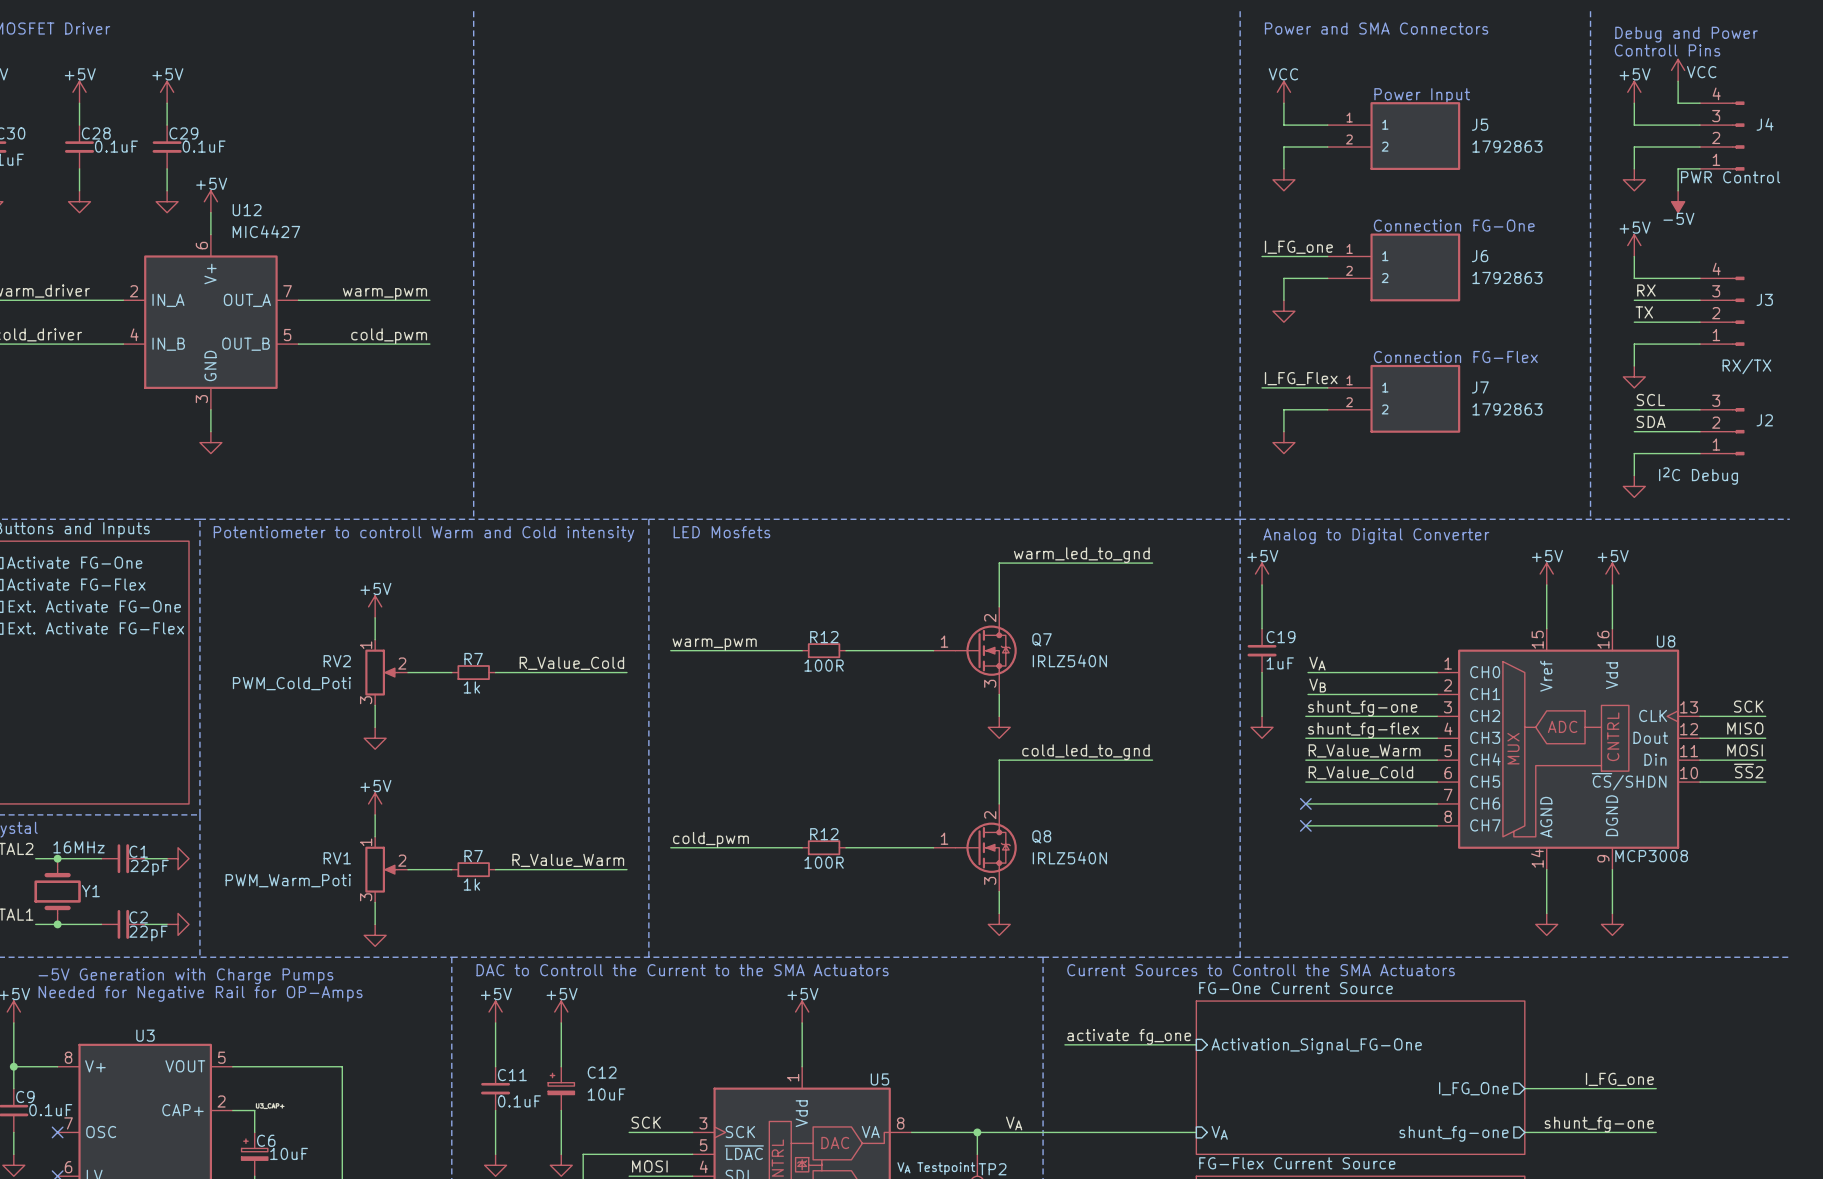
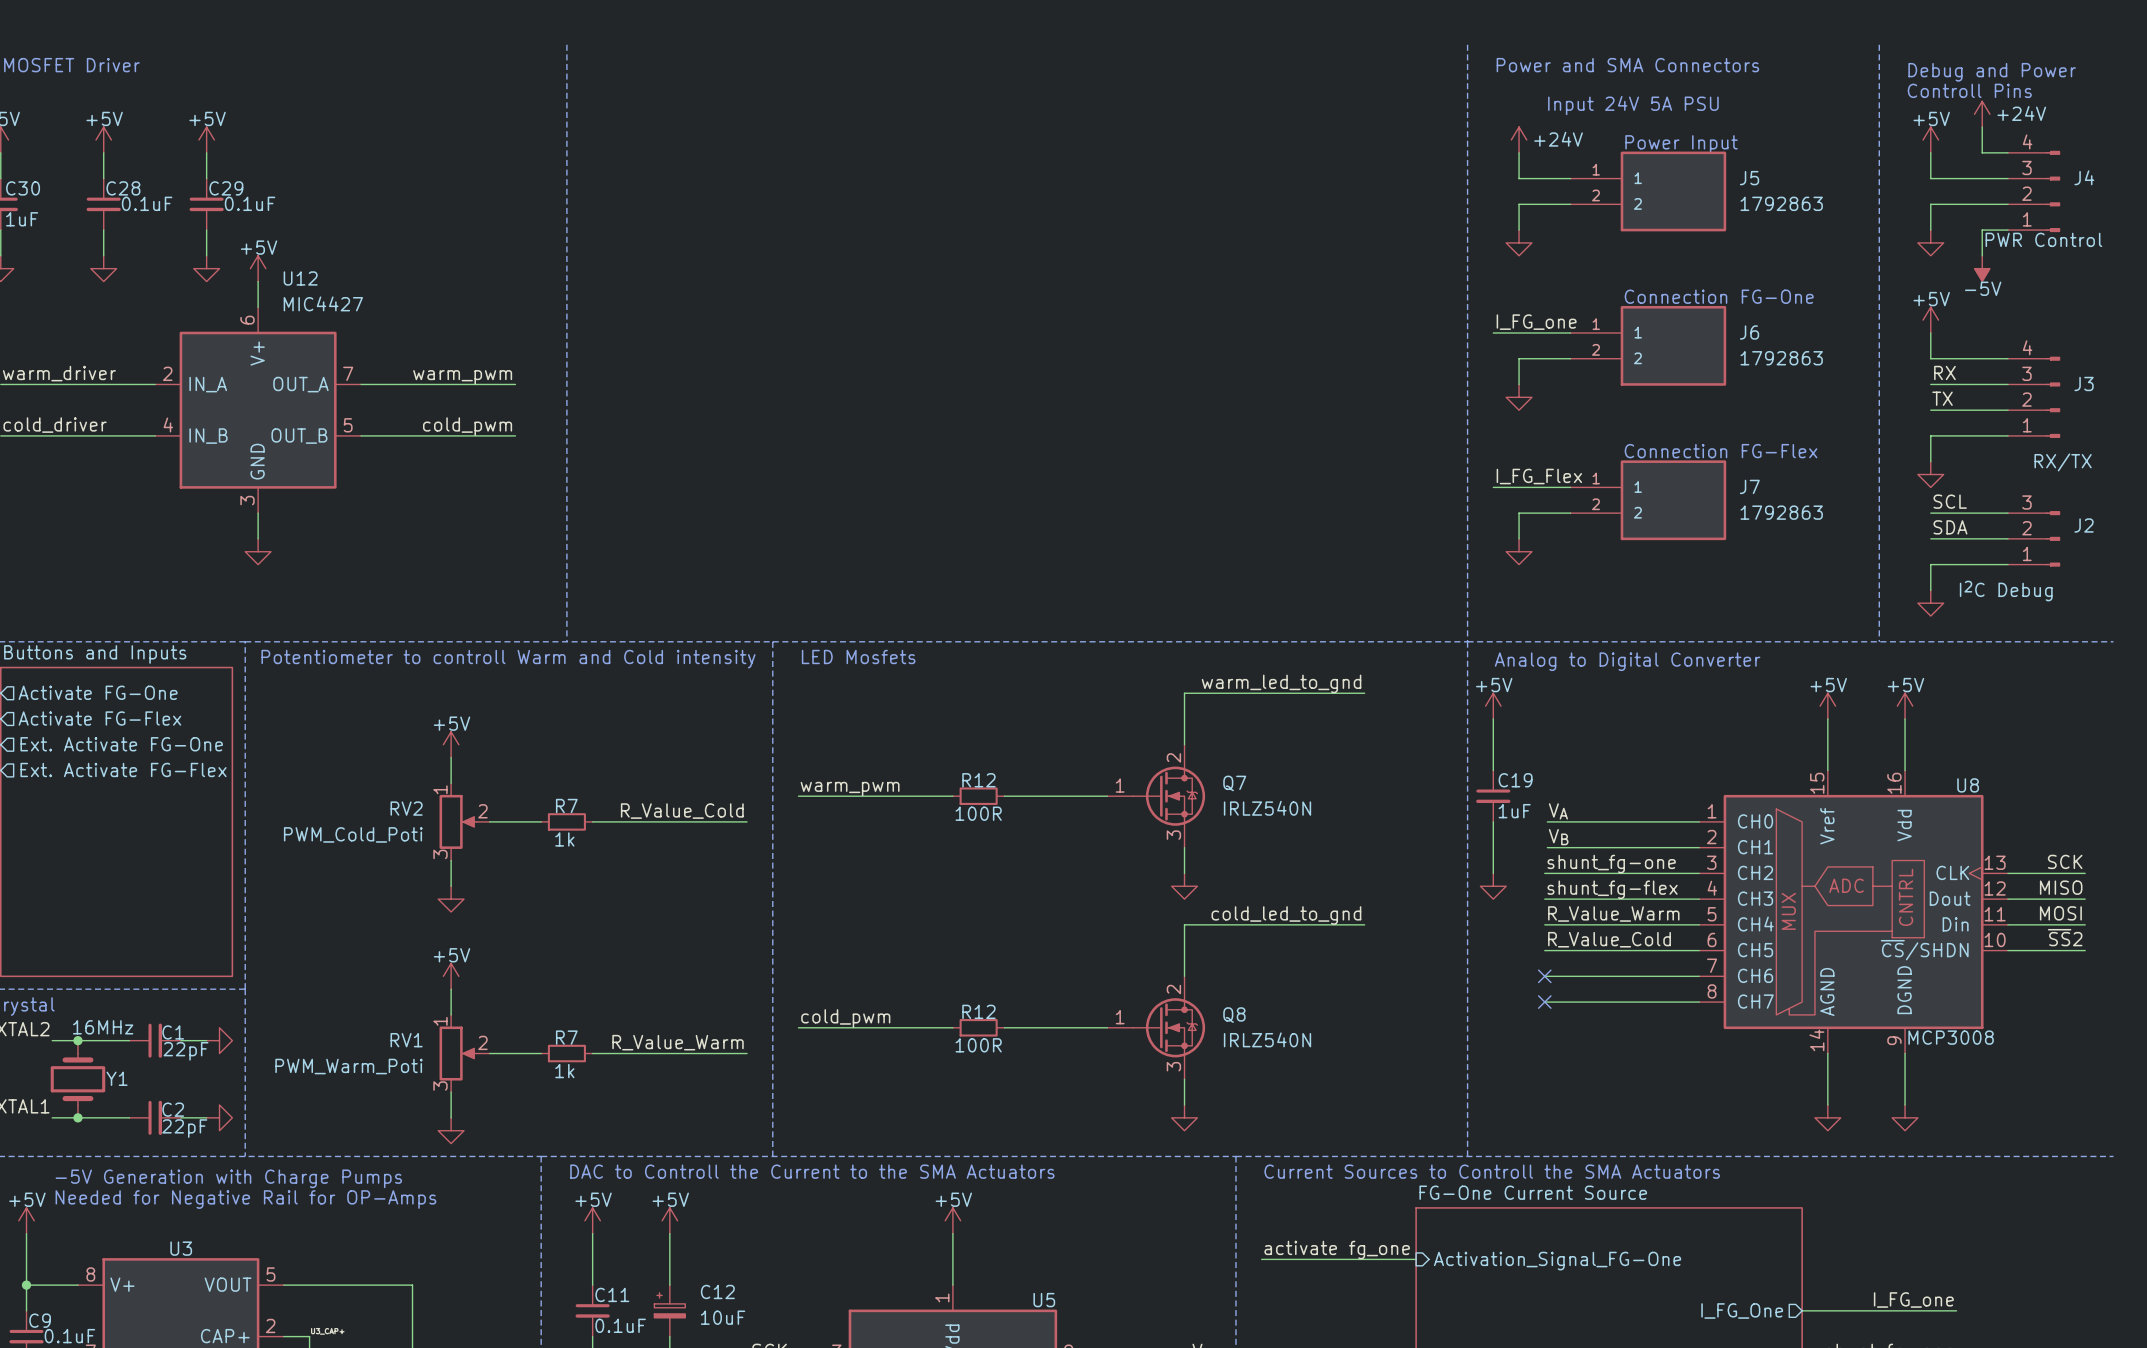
text: none -> Input 24V 5A PSU (1633, 105)
power symbol: VCC (1678, 70) -> +24V (1982, 114)
power symbol: VCC (1283, 92) -> +24V (1519, 139)

